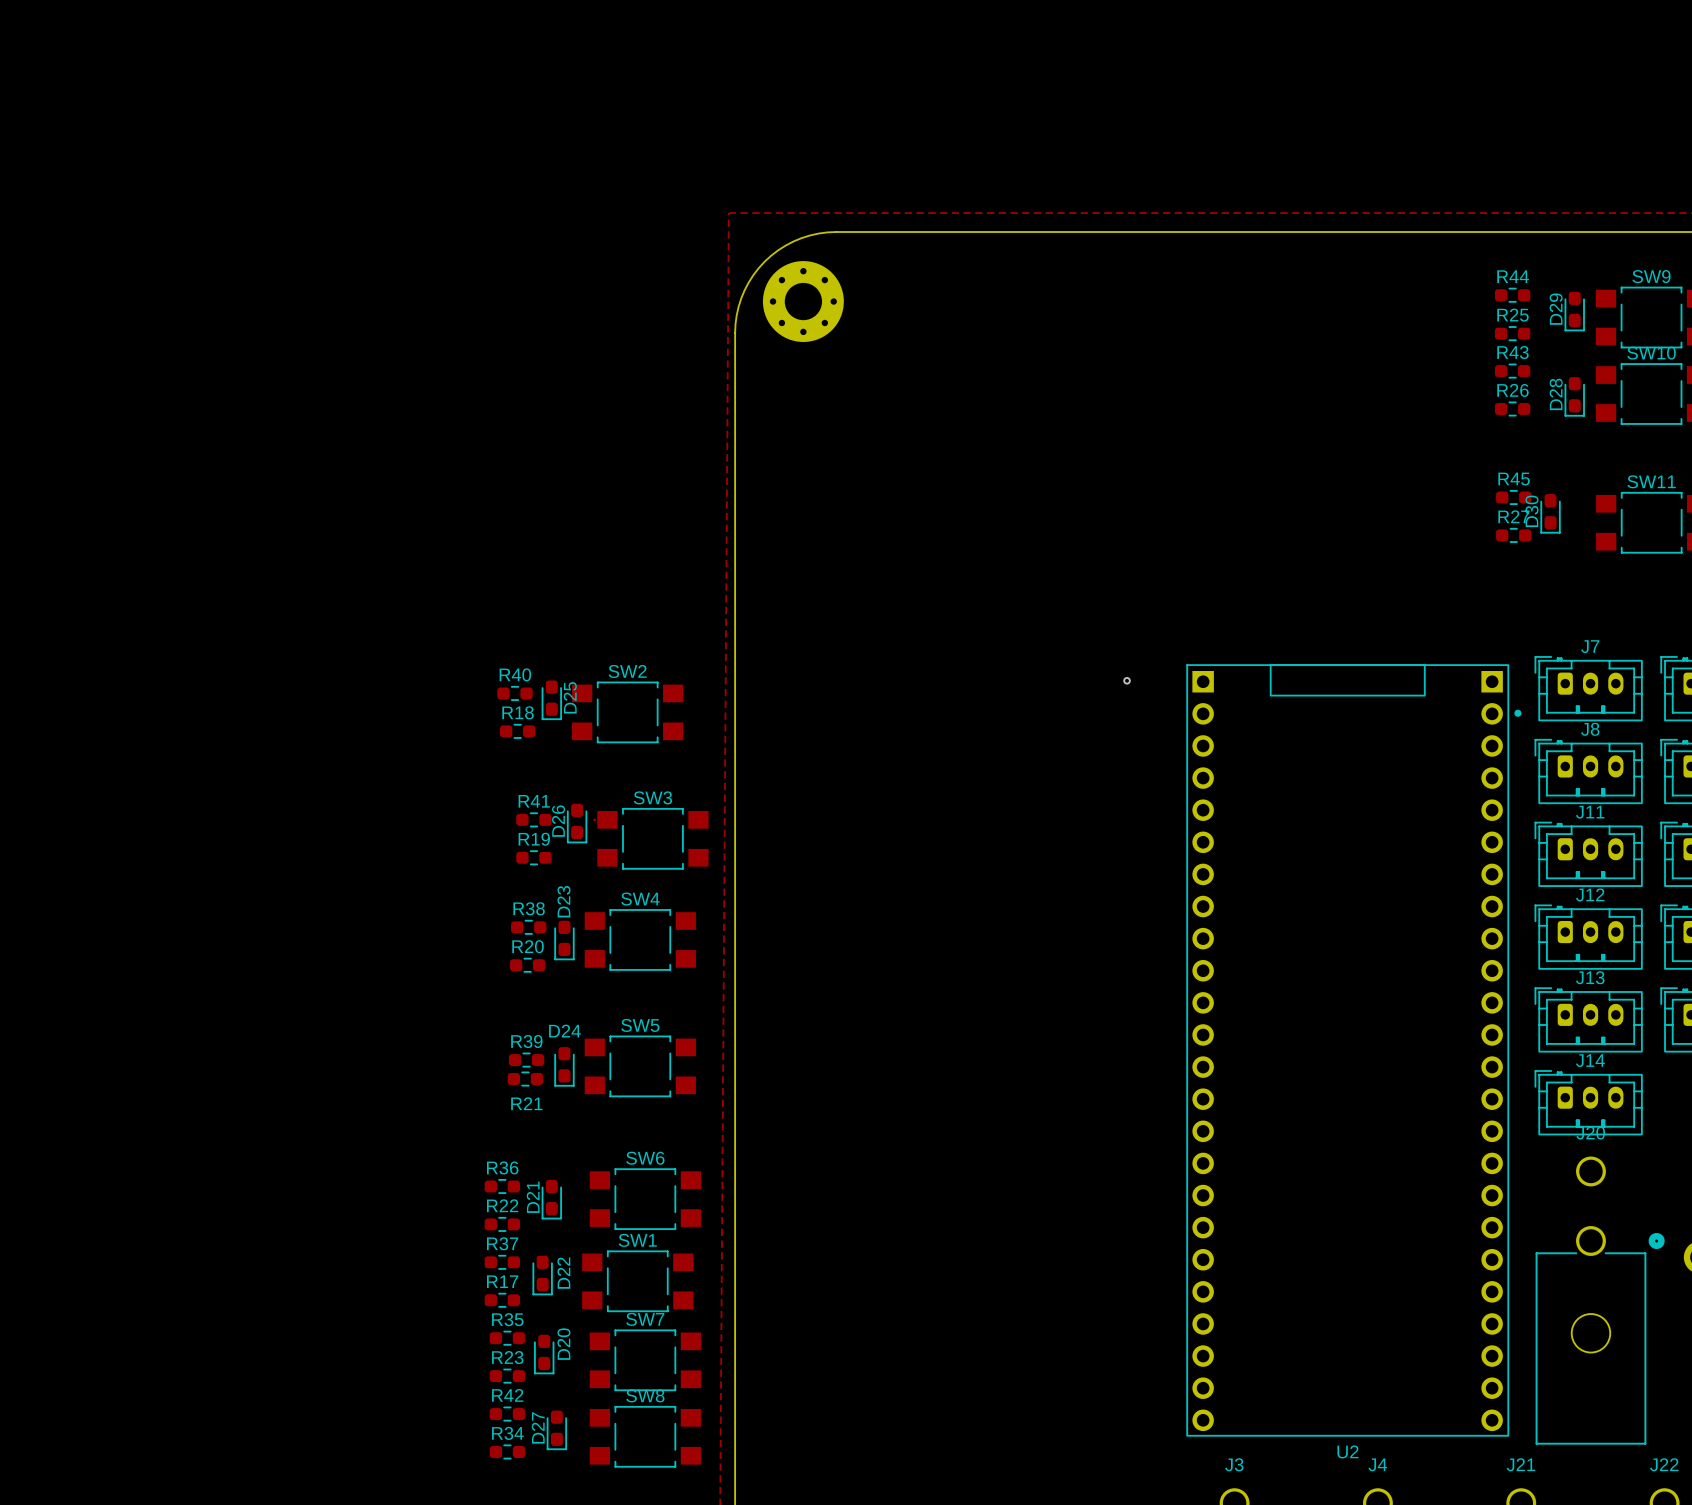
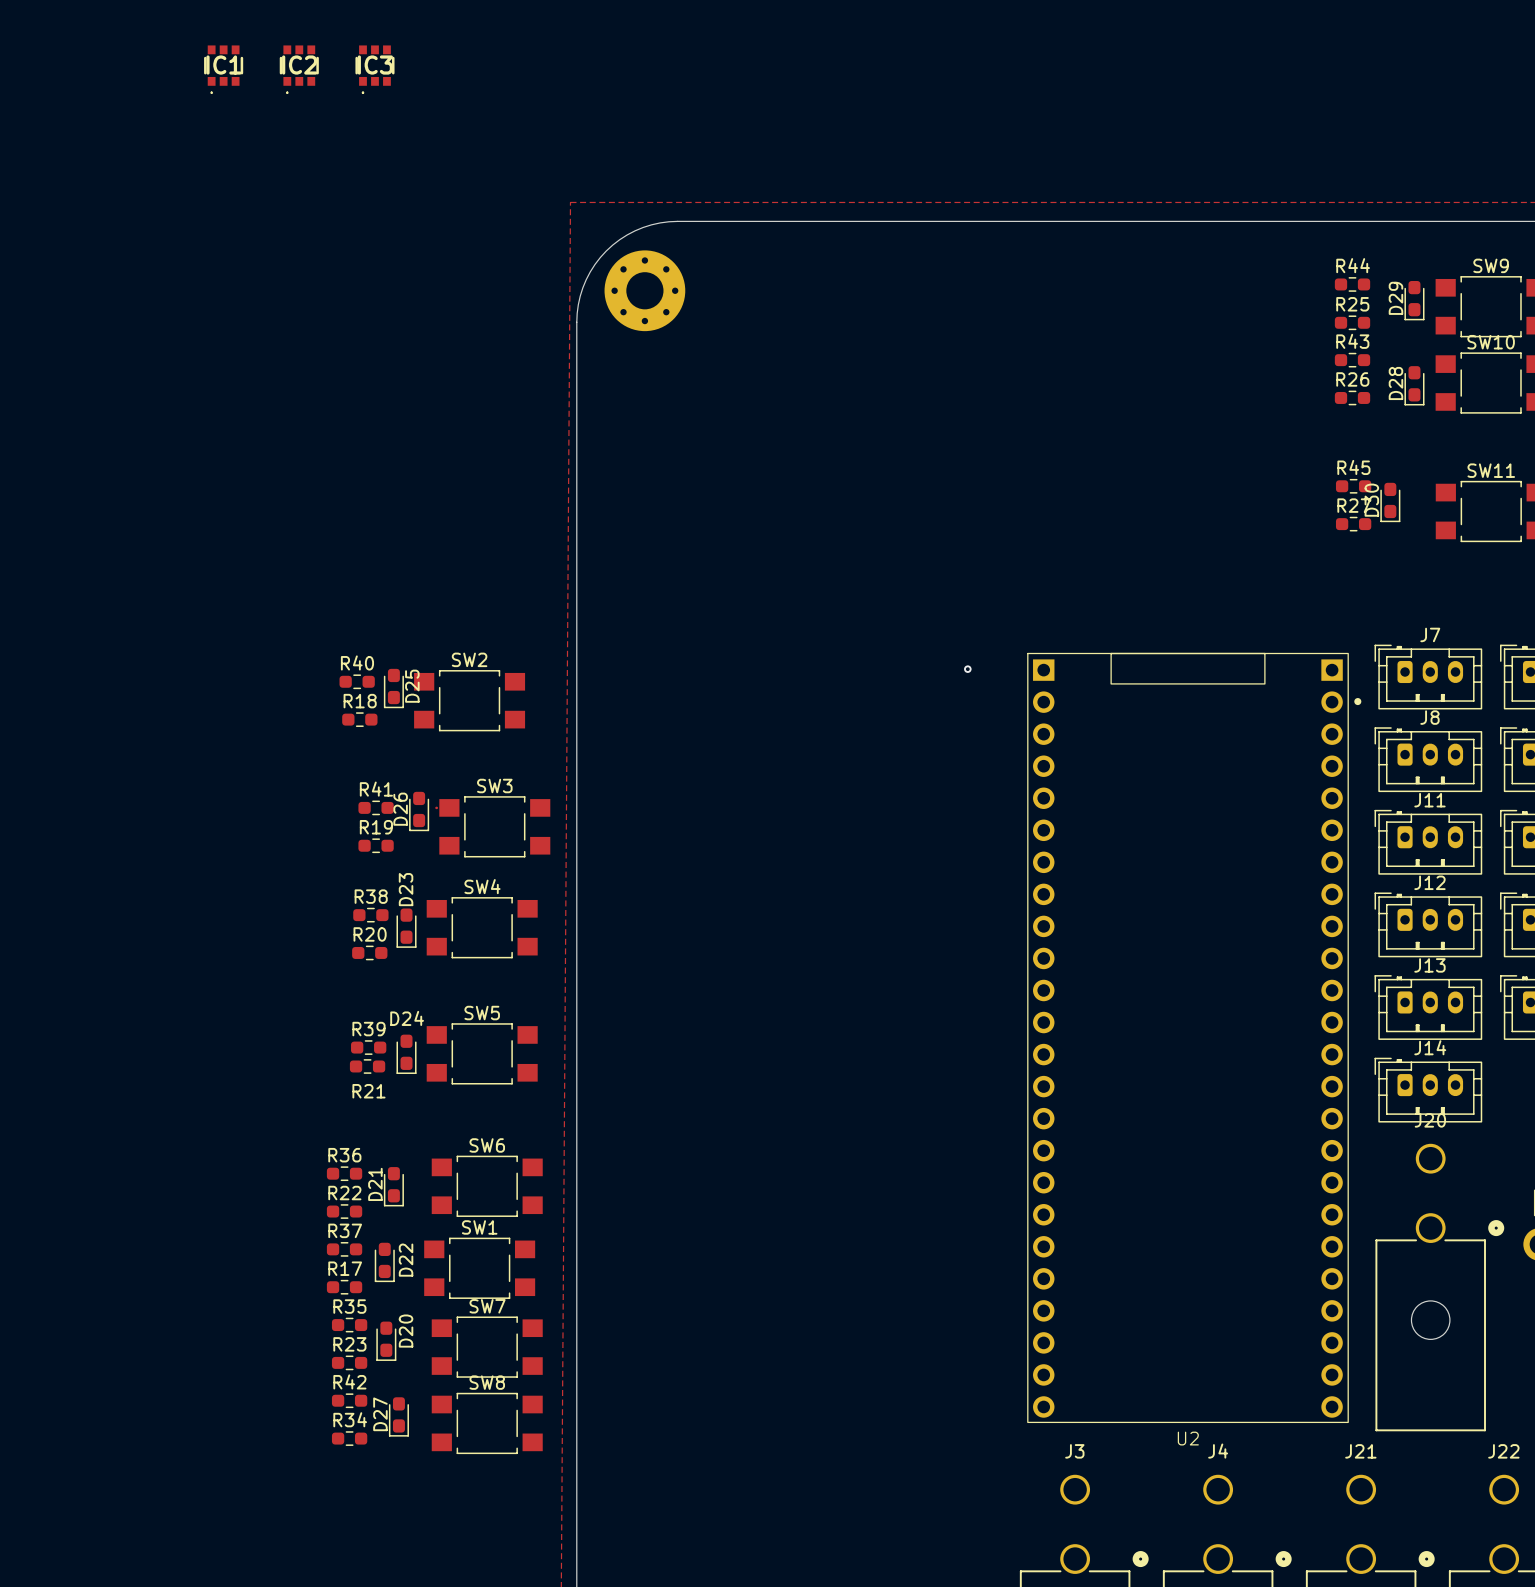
IC1: none -> (223, 69)
IC2: none -> (299, 69)
IC3: none -> (374, 69)

